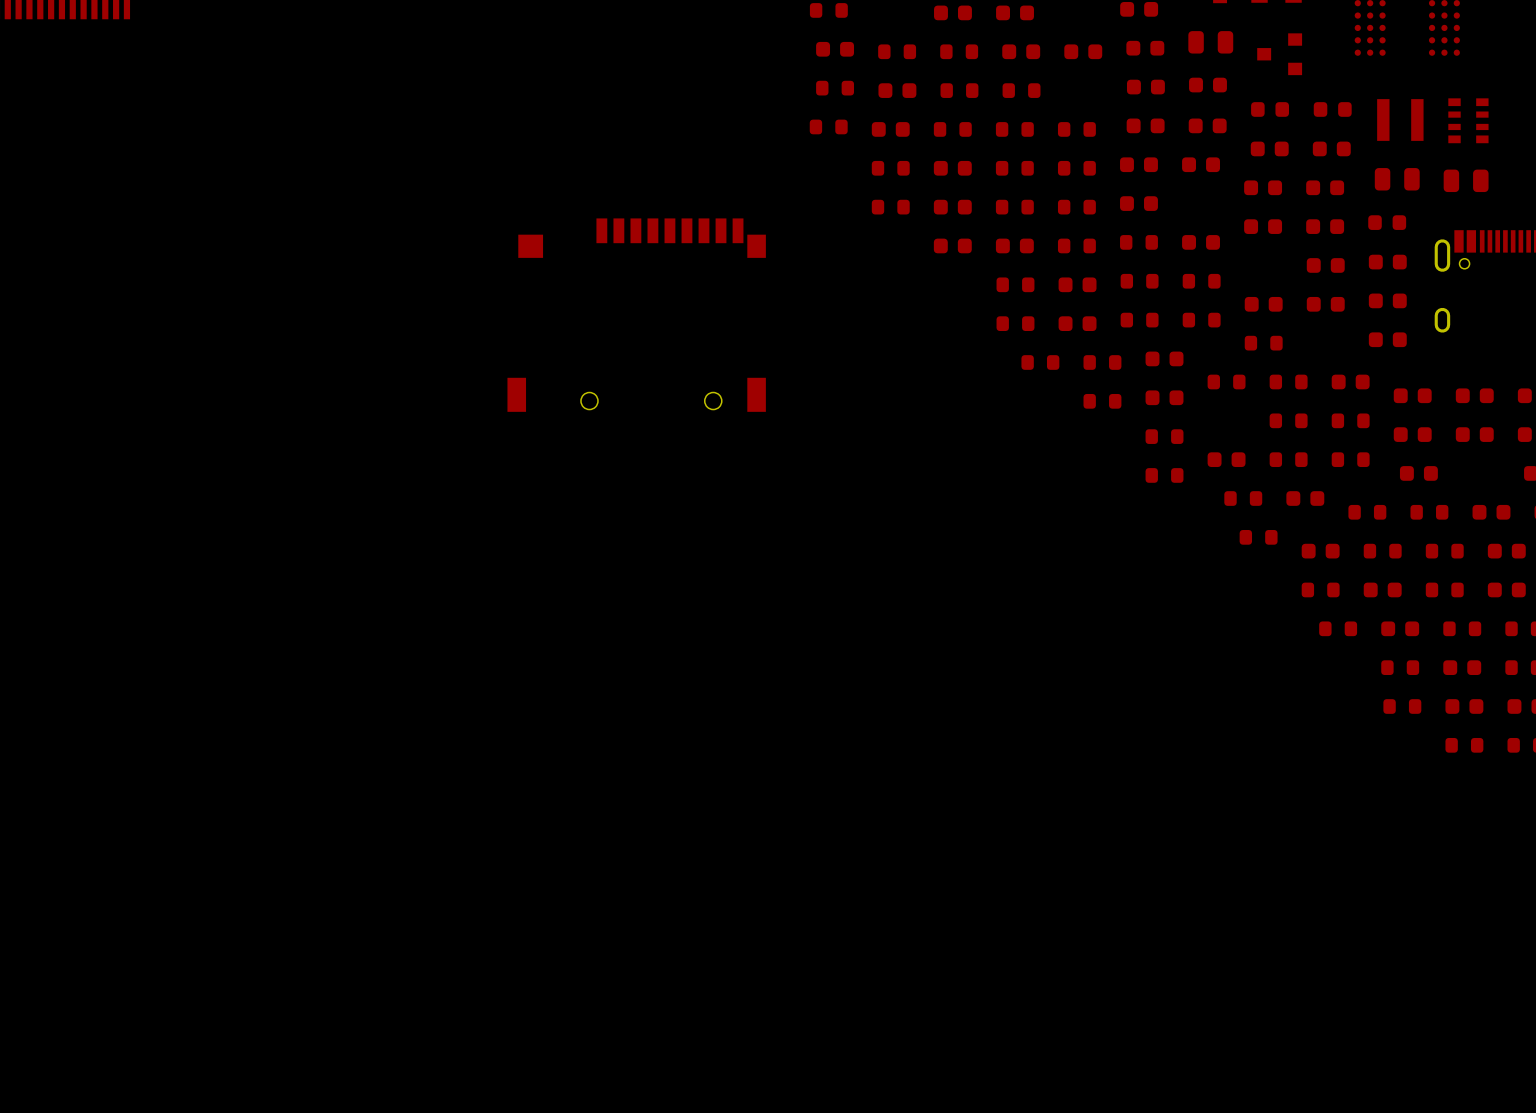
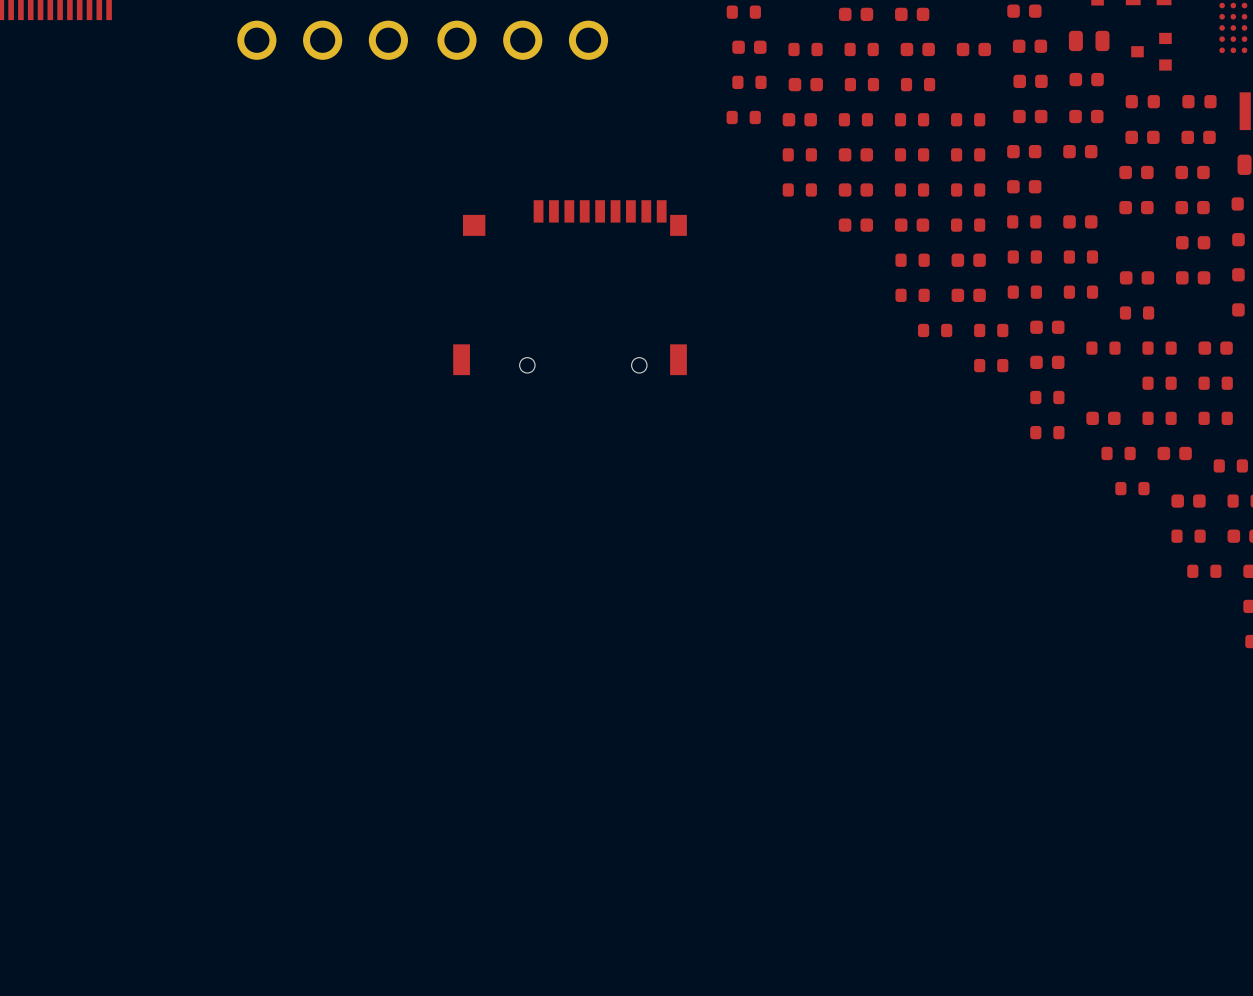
part: none -> (322, 40)
part: none -> (522, 40)

